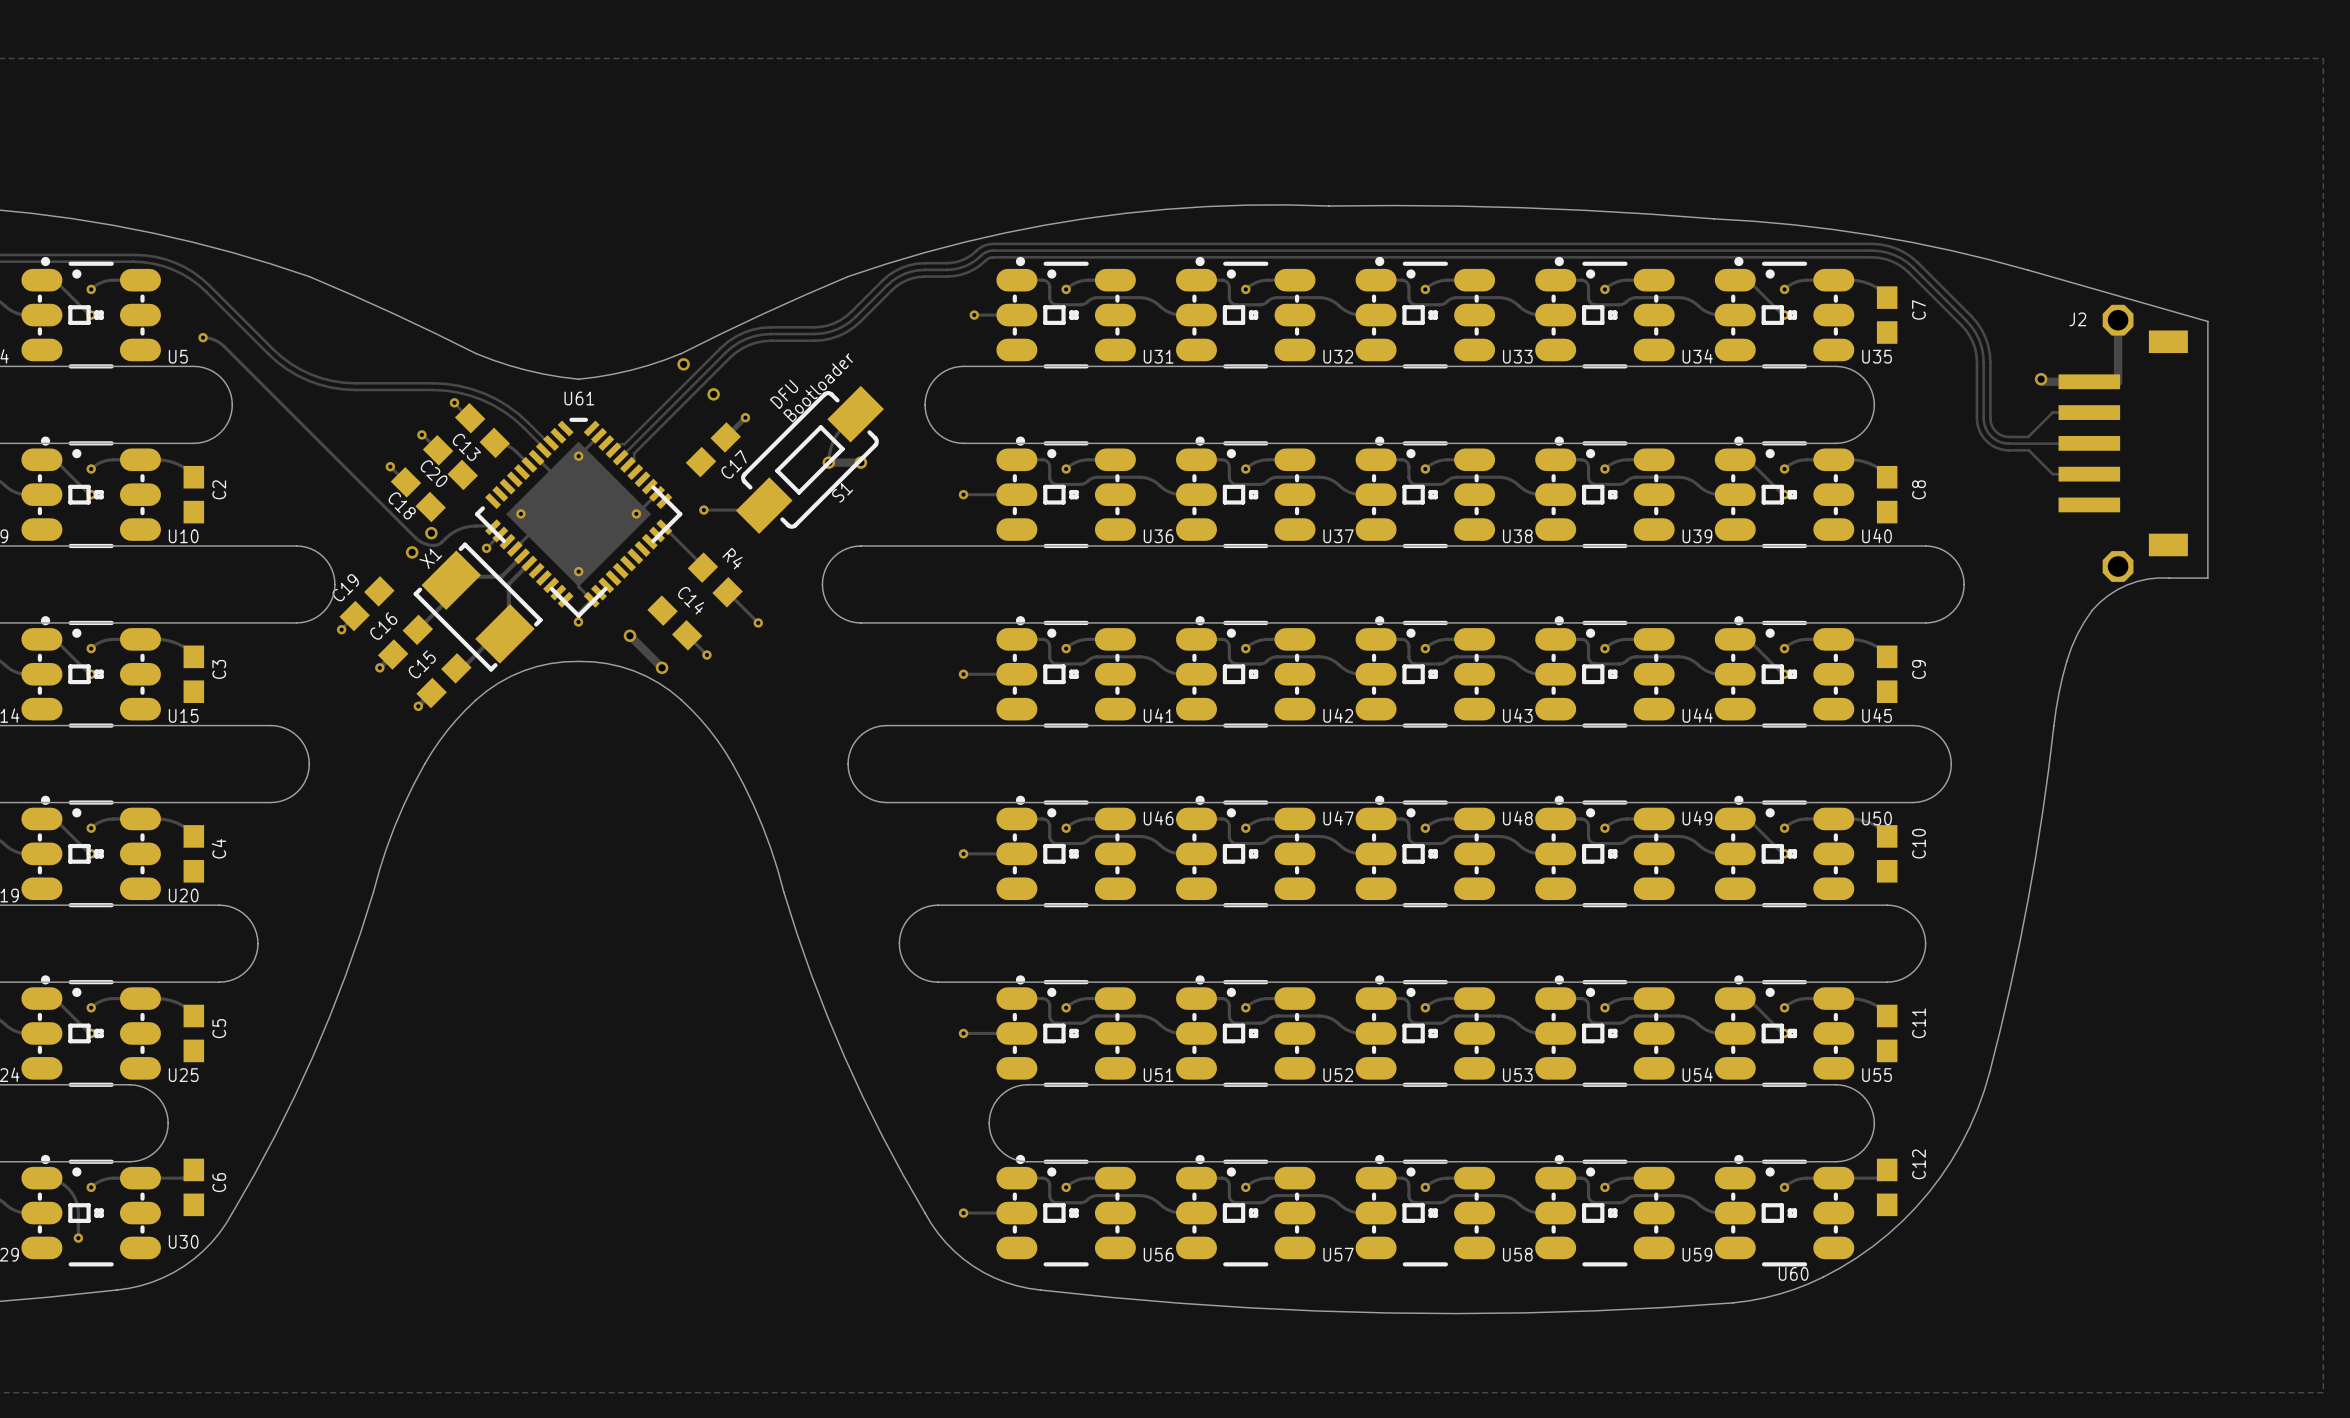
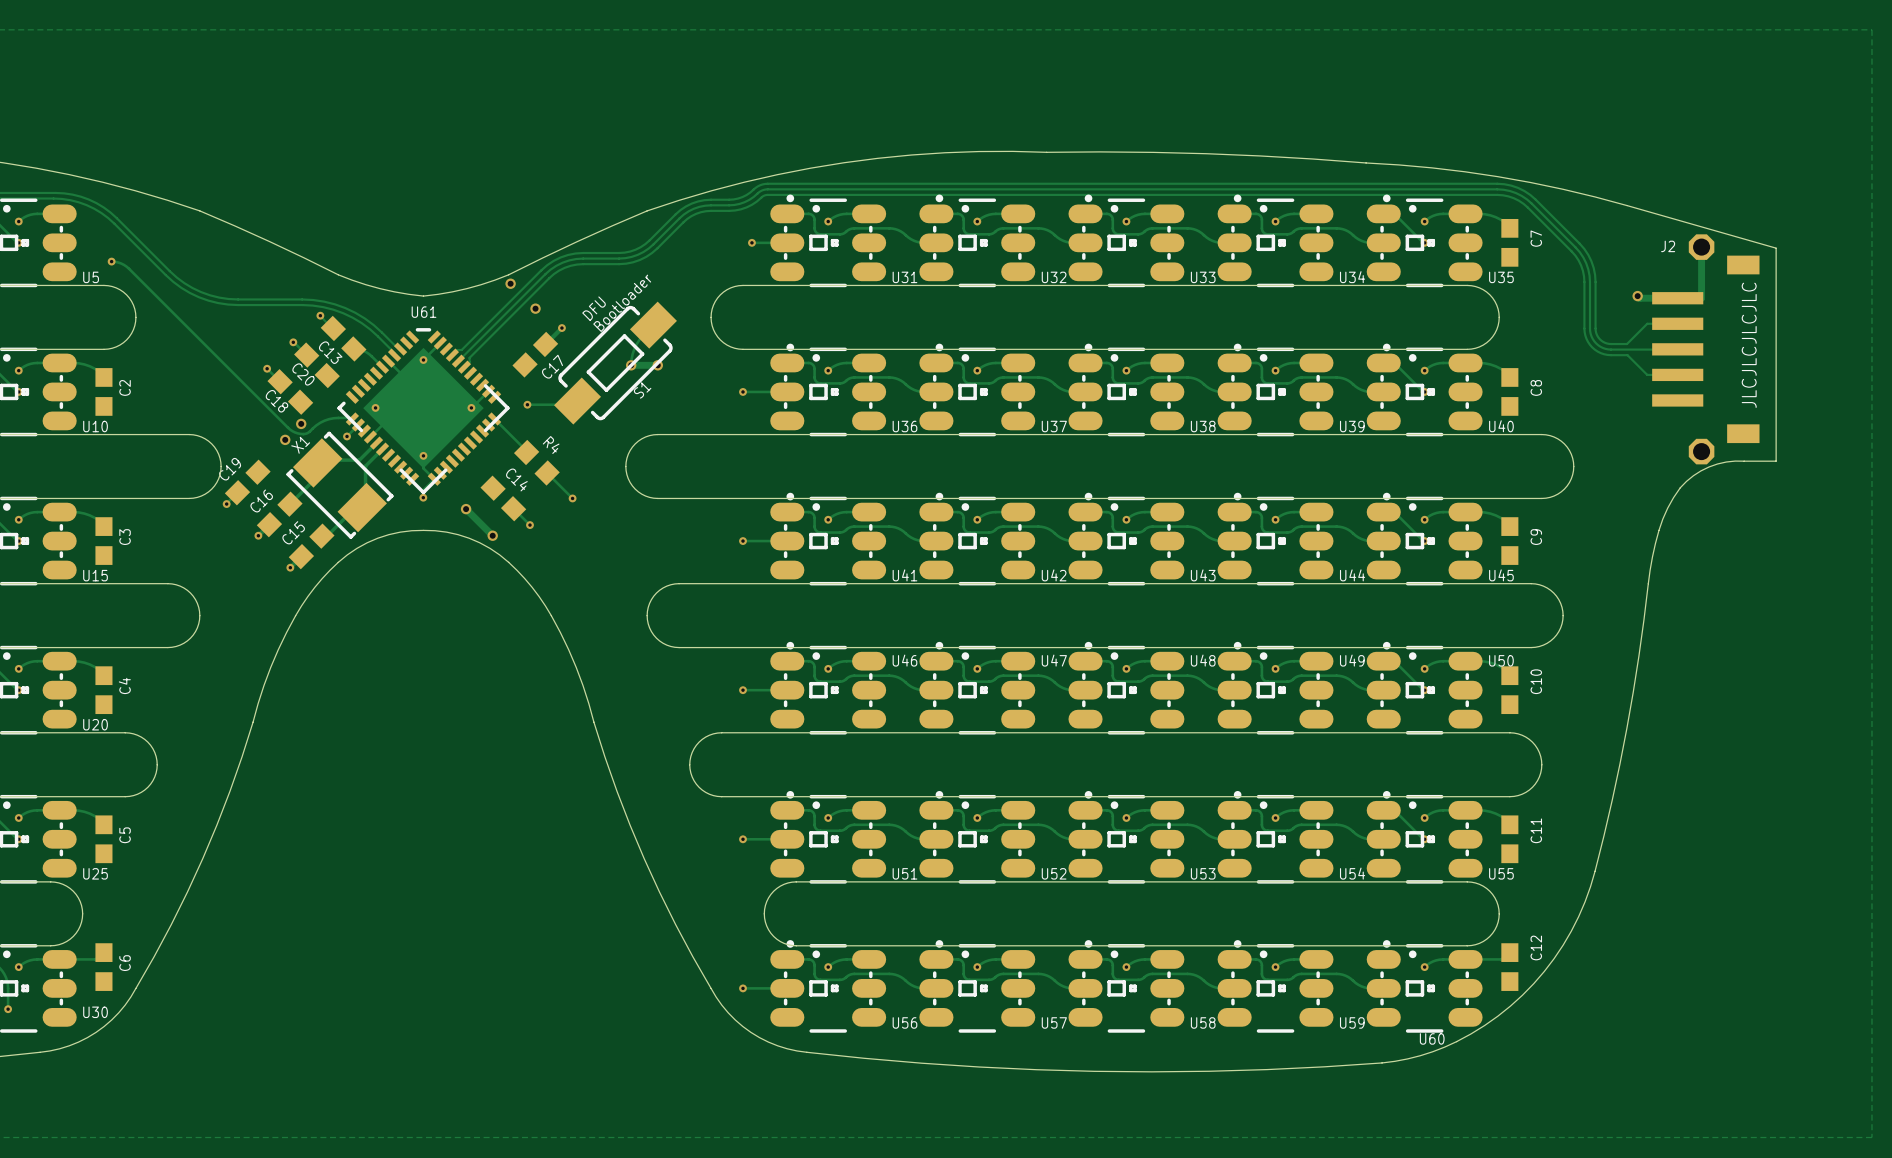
text: none -> JLCJLCJLCJLC (1749, 345)

